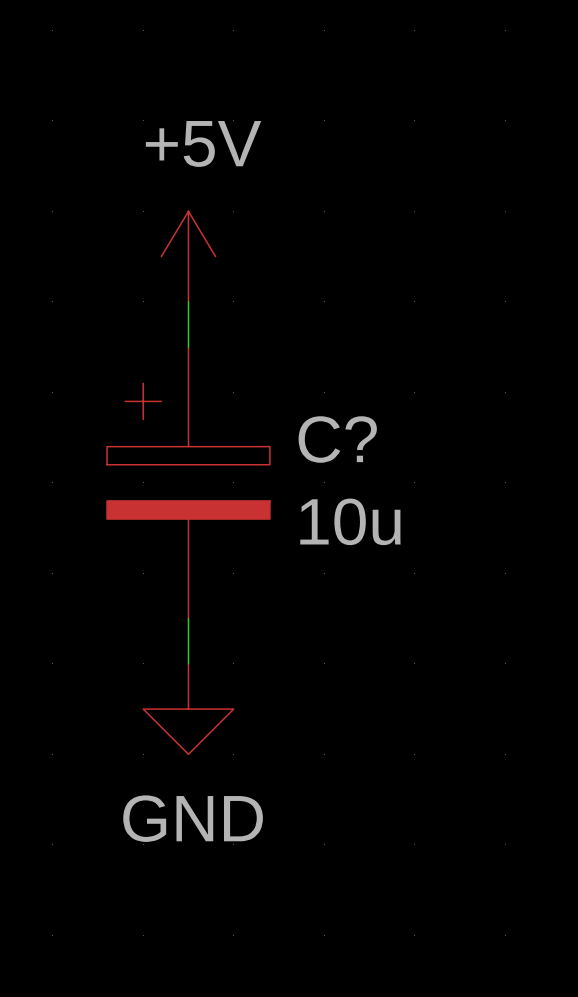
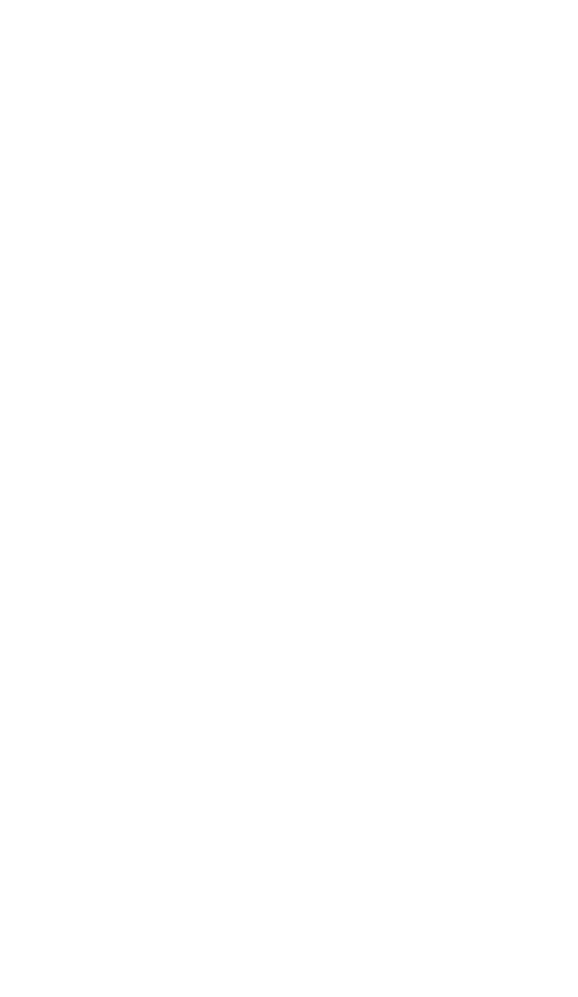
power symbol: +5V (188, 256) -> none
wire: (188, 301) (188, 347) -> none
C?: 10u (188, 482) -> none
wire: (188, 618) (188, 663) -> none
power symbol: GND (188, 709) -> none

